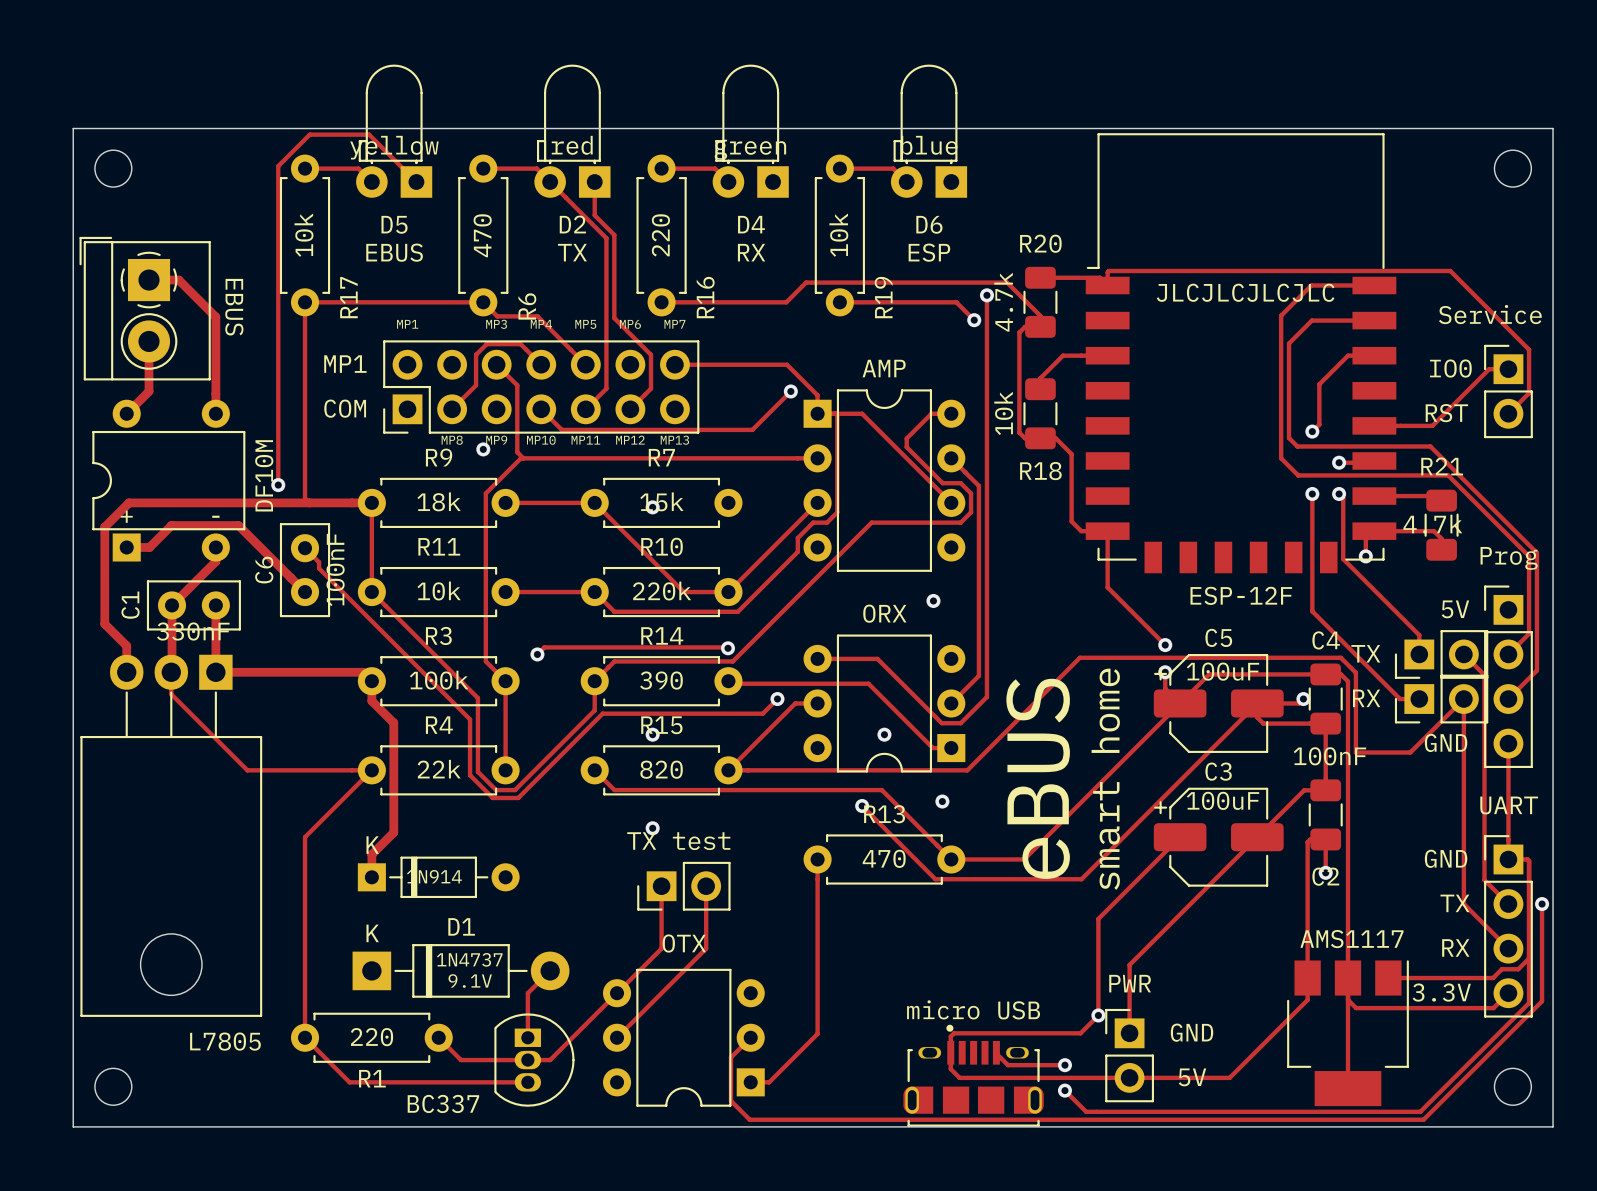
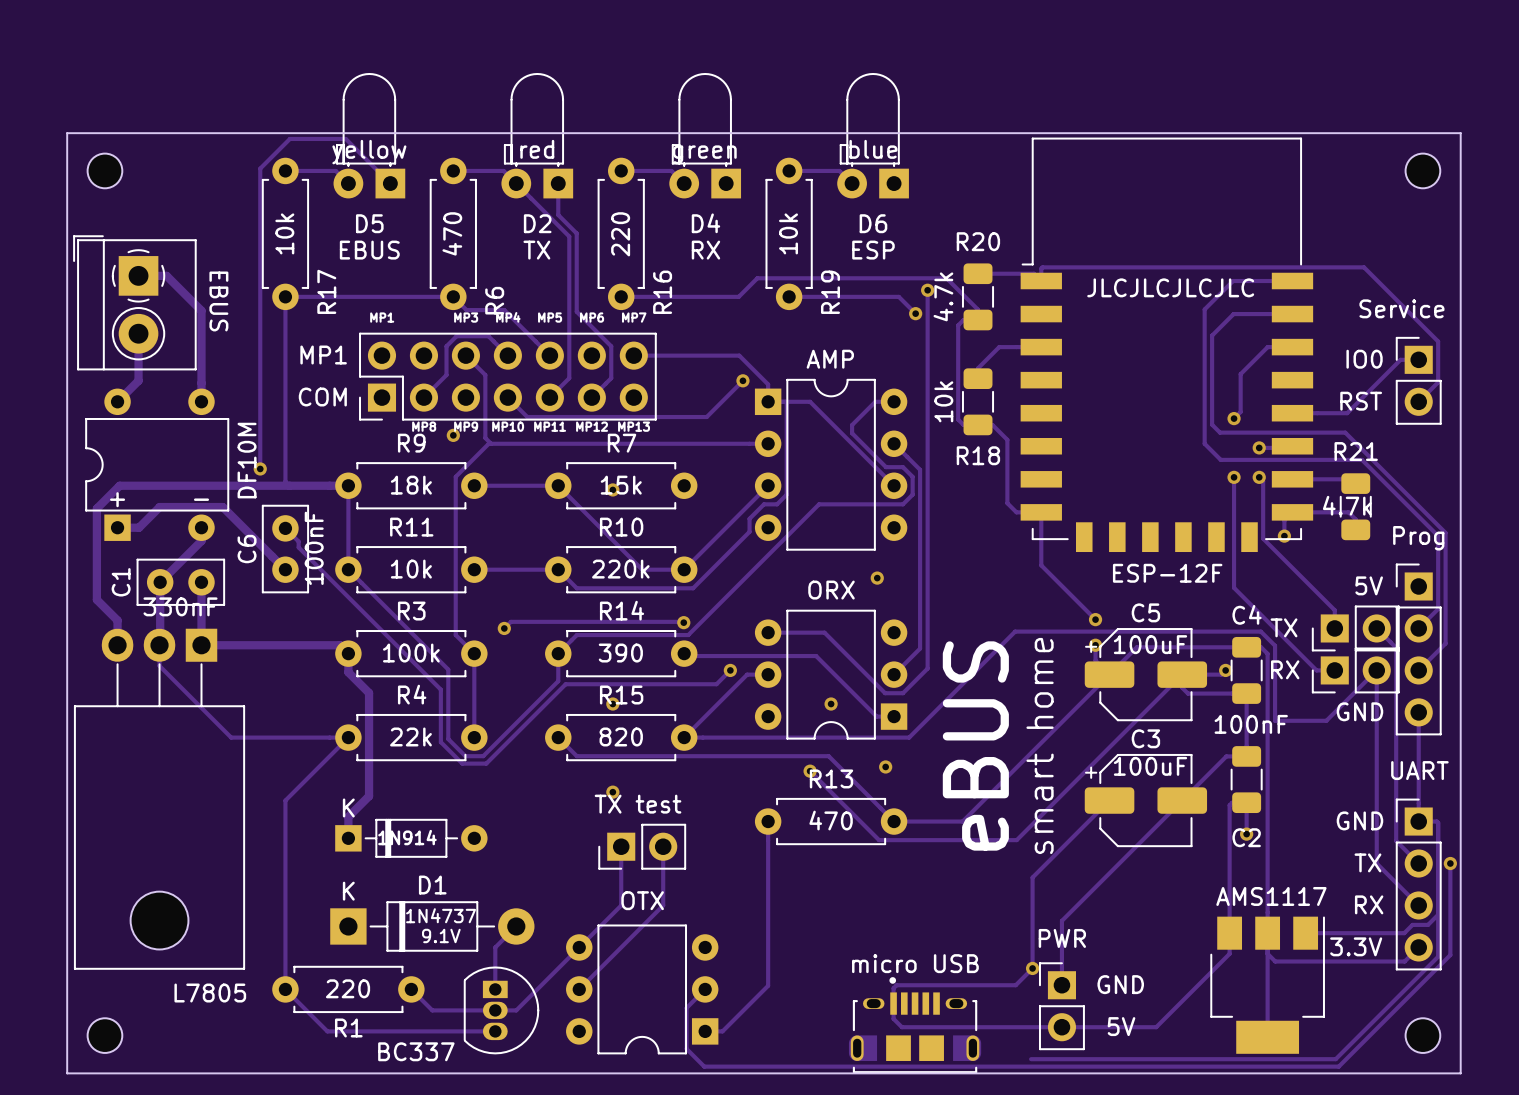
track: (996, 1052) (1008, 1065) (1064, 1065) -> none
via: (1064, 1065) -> none
track: (1064, 1090) (1086, 1111) (1096, 1111) -> none
via: (1064, 1090) -> none

